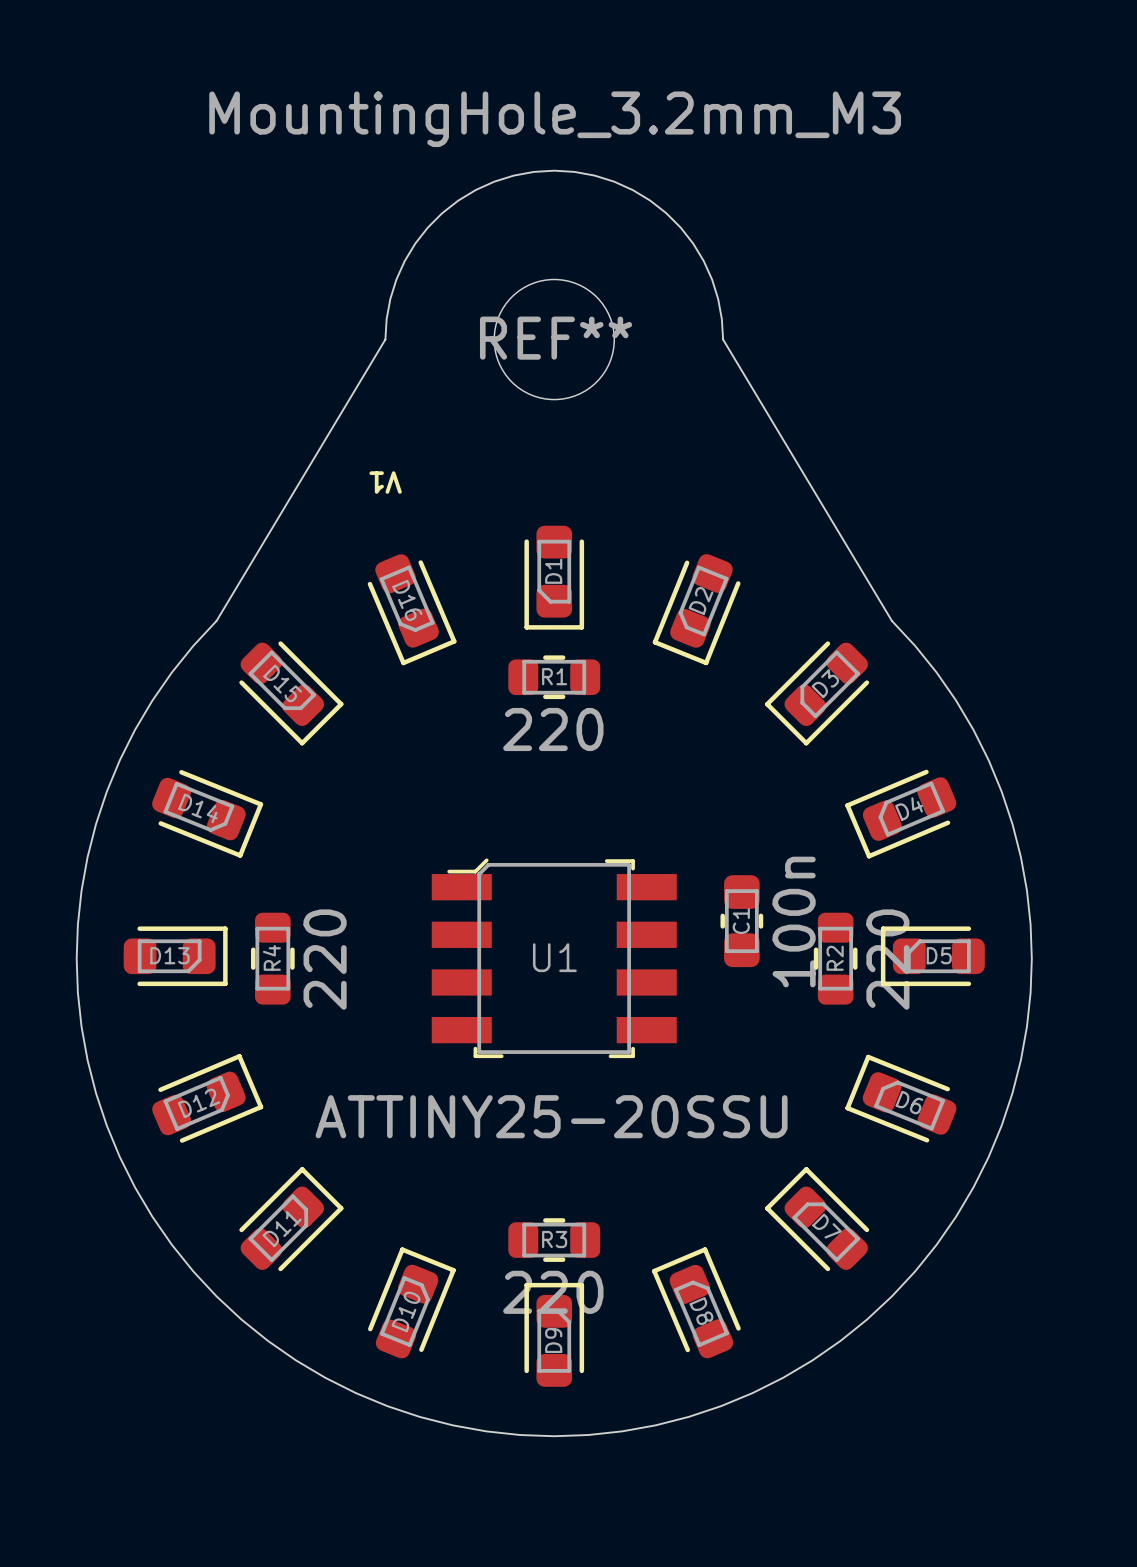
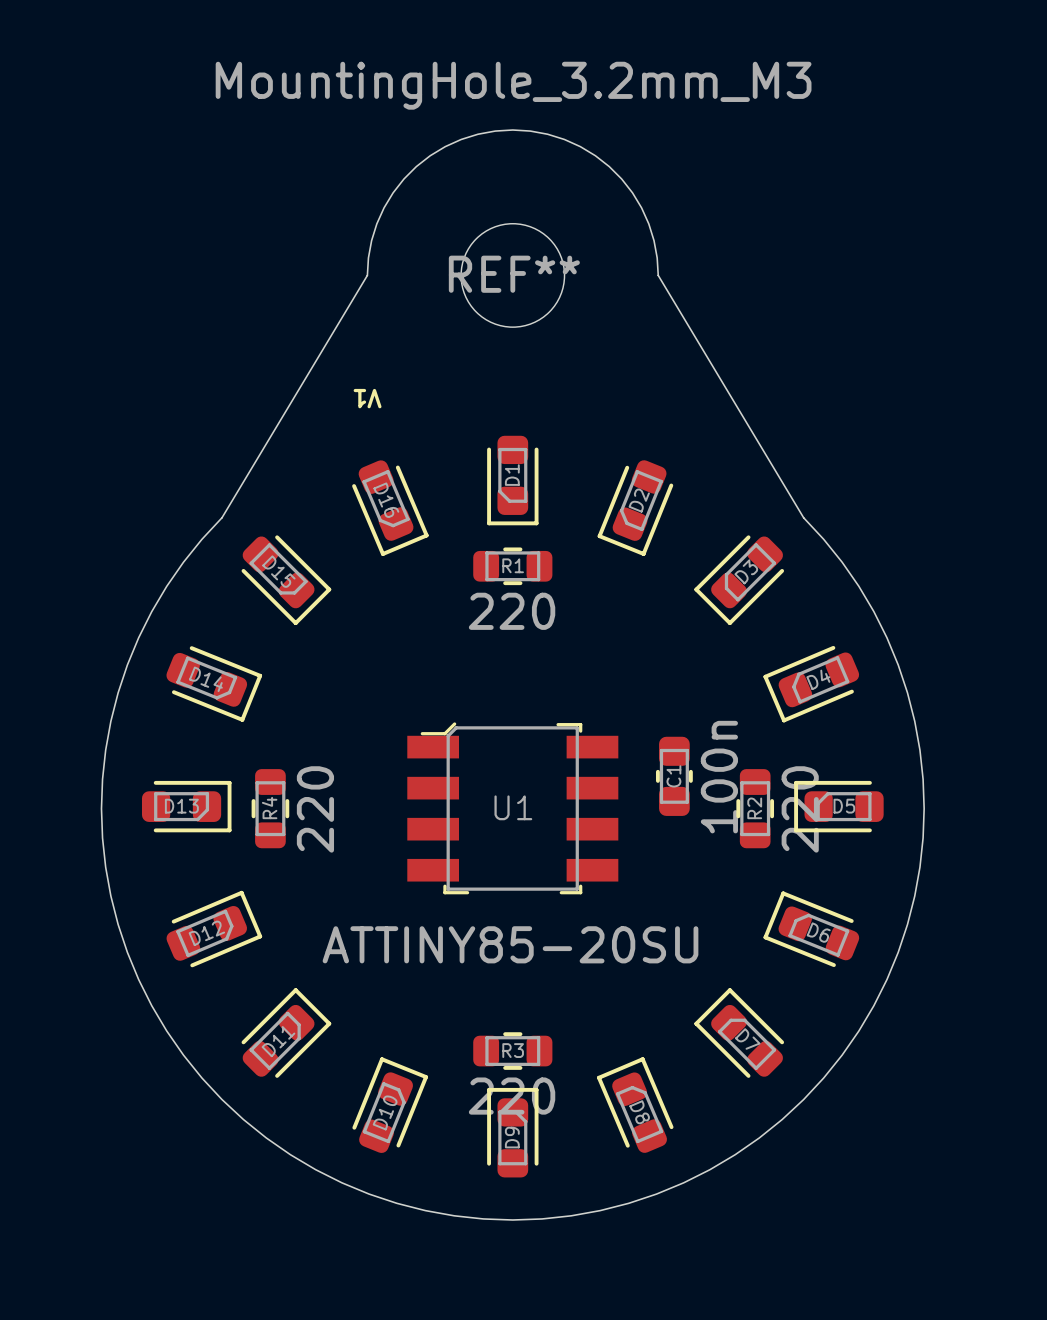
U1 value: ATTINY25-20SSU (551, 1116) -> ATTINY85-20SU (510, 944)

